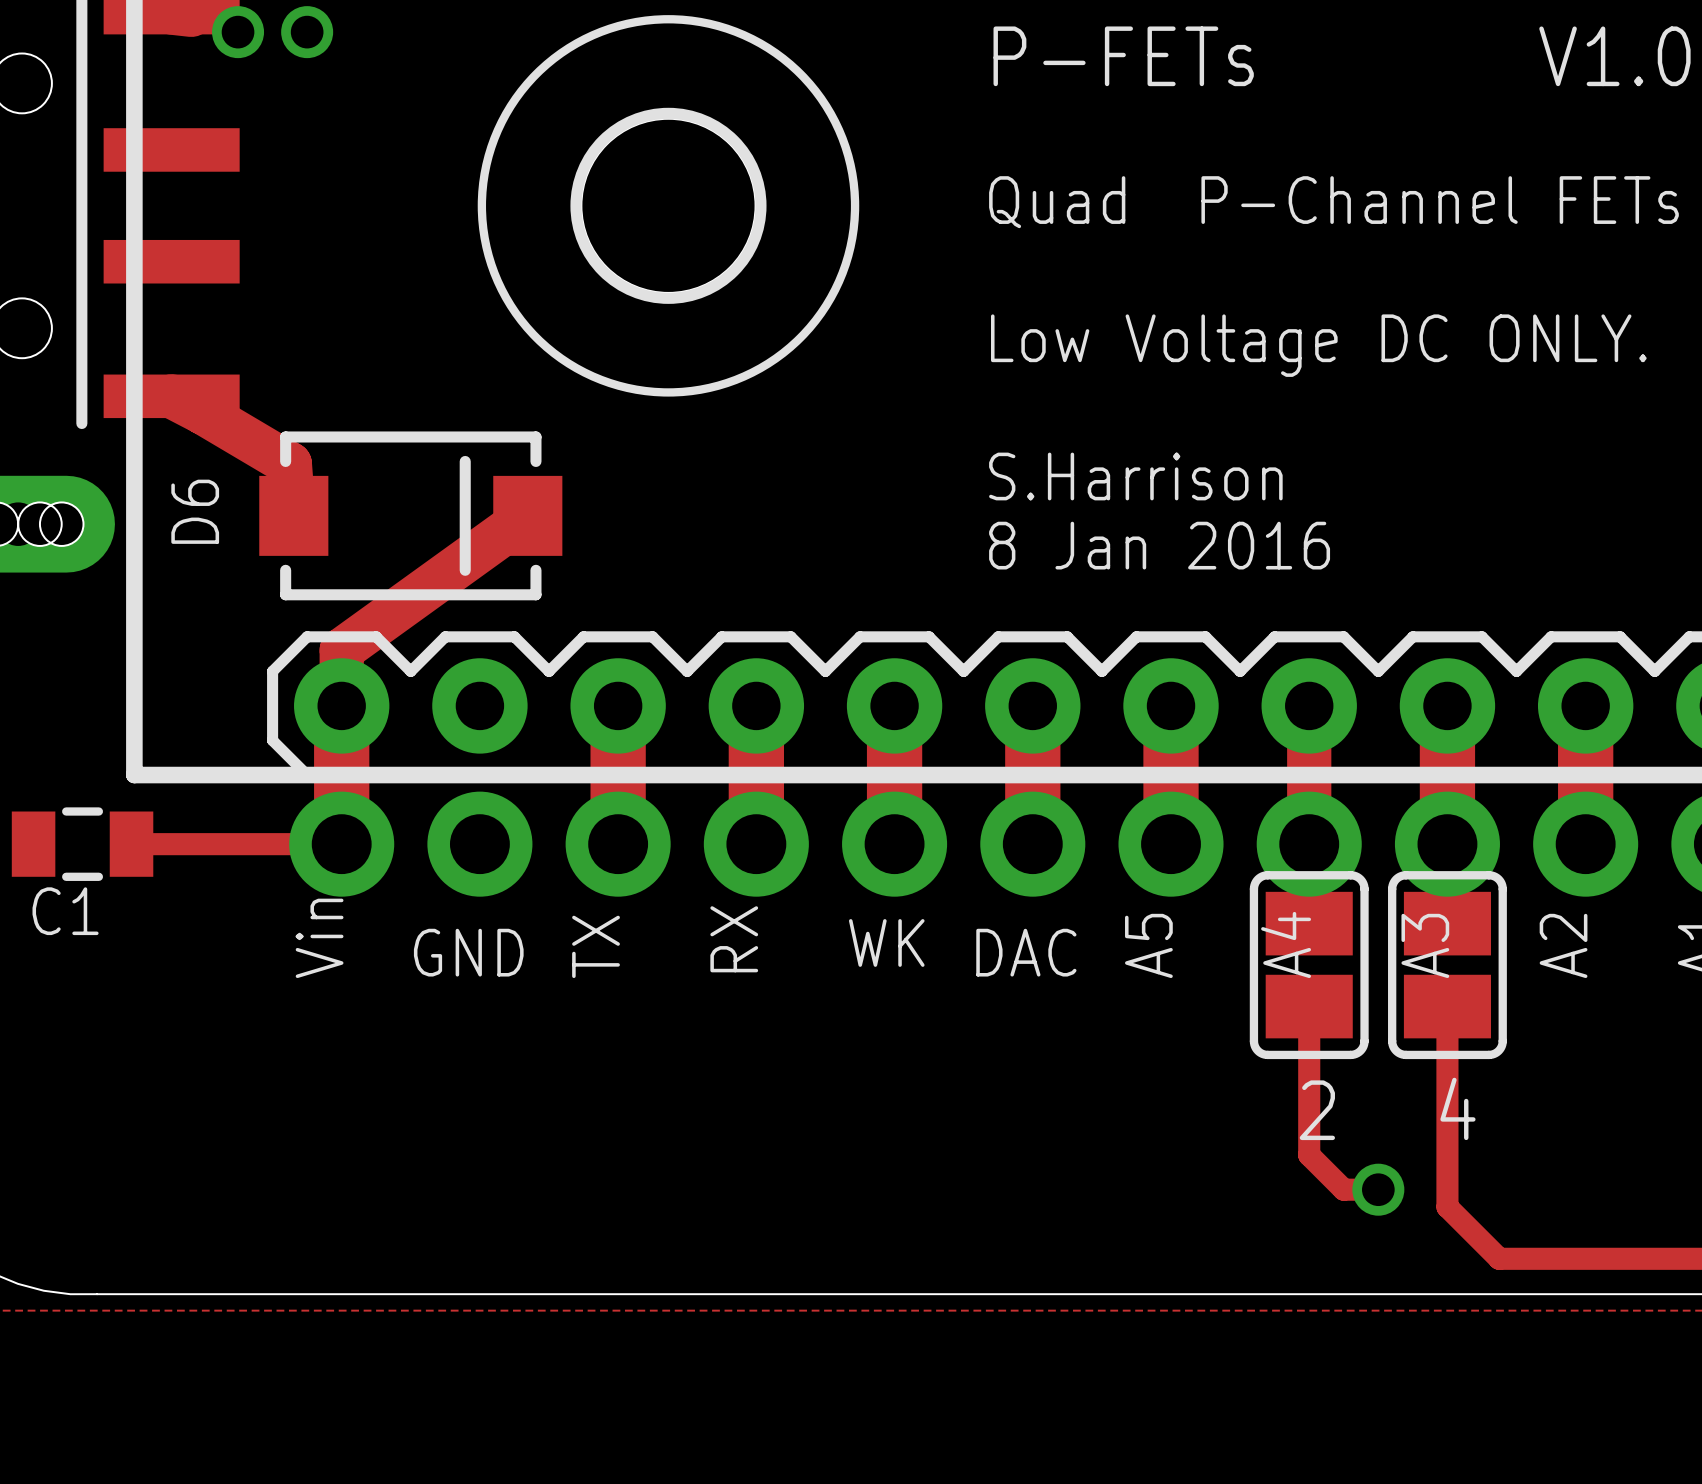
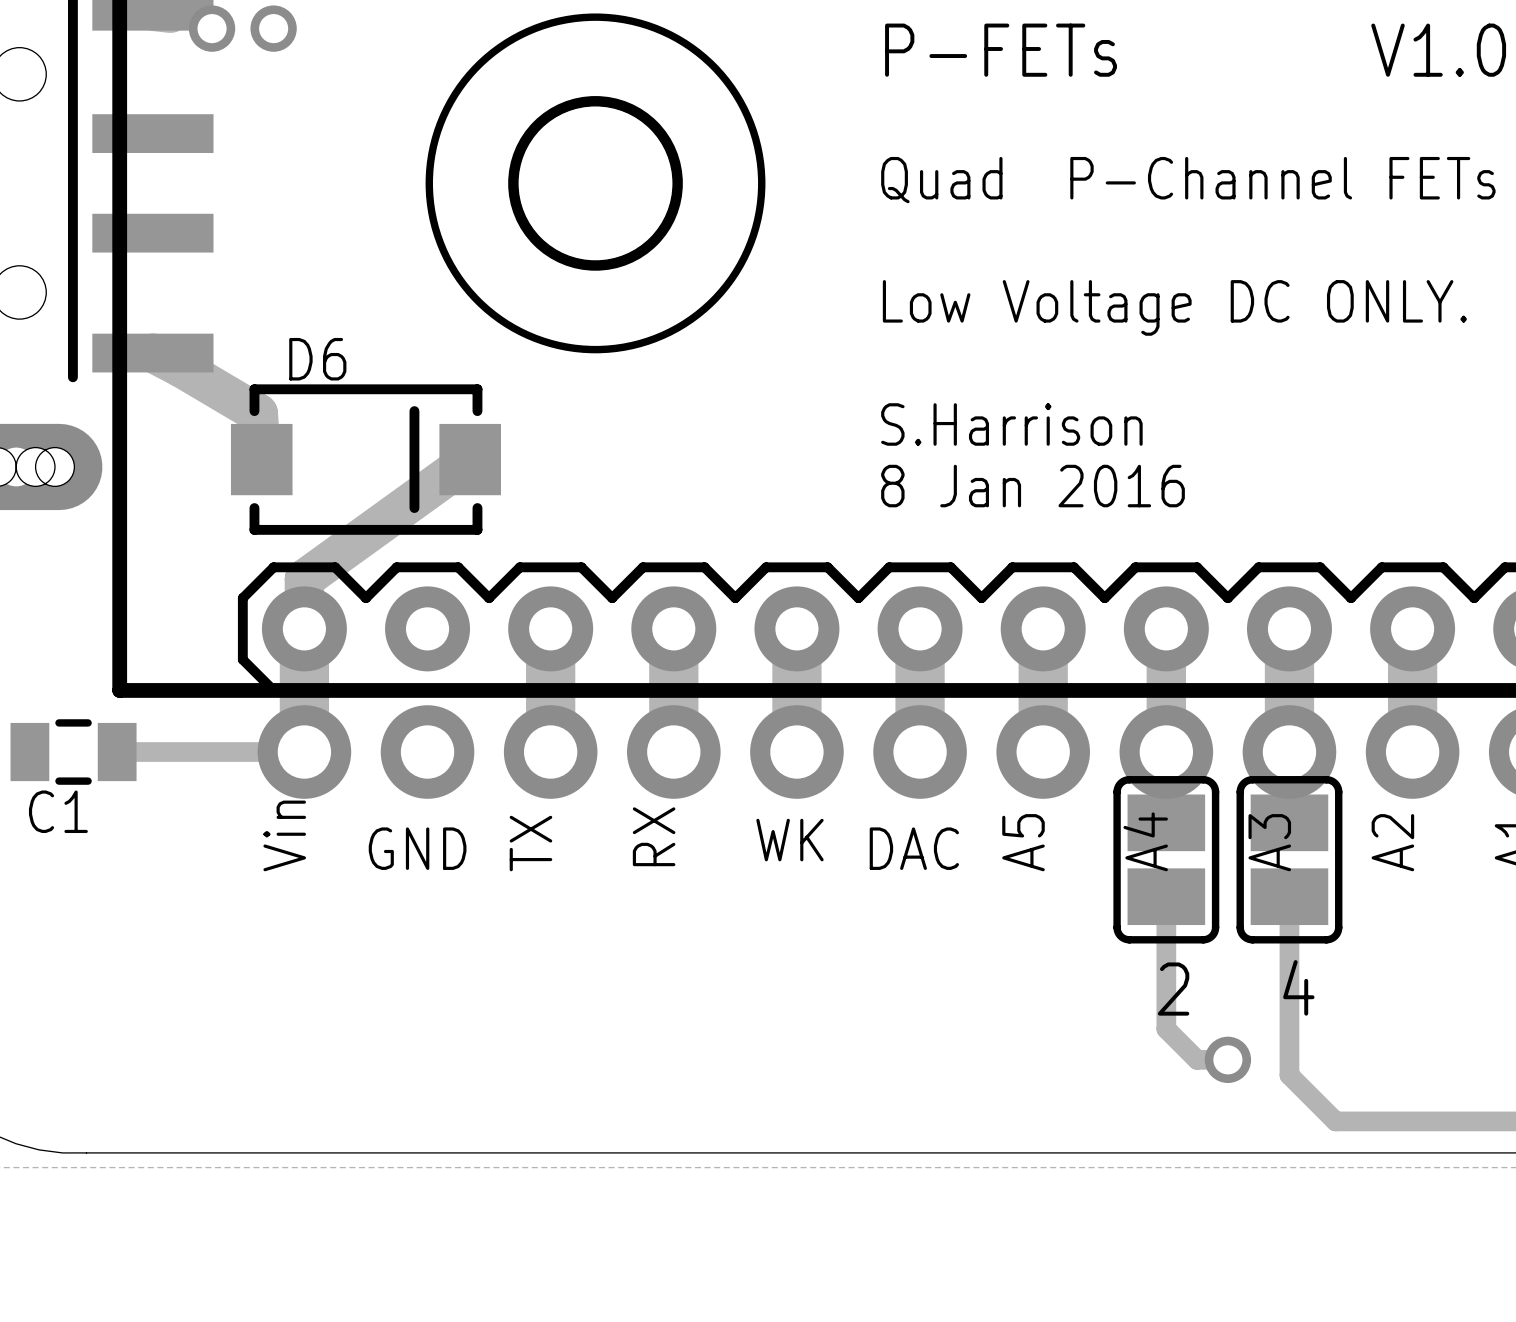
D6 name rotation: 0° (195, 511) -> 90° clockwise (317, 359)
D6 name position: D6 (195, 511) -> D6 (317, 359)

